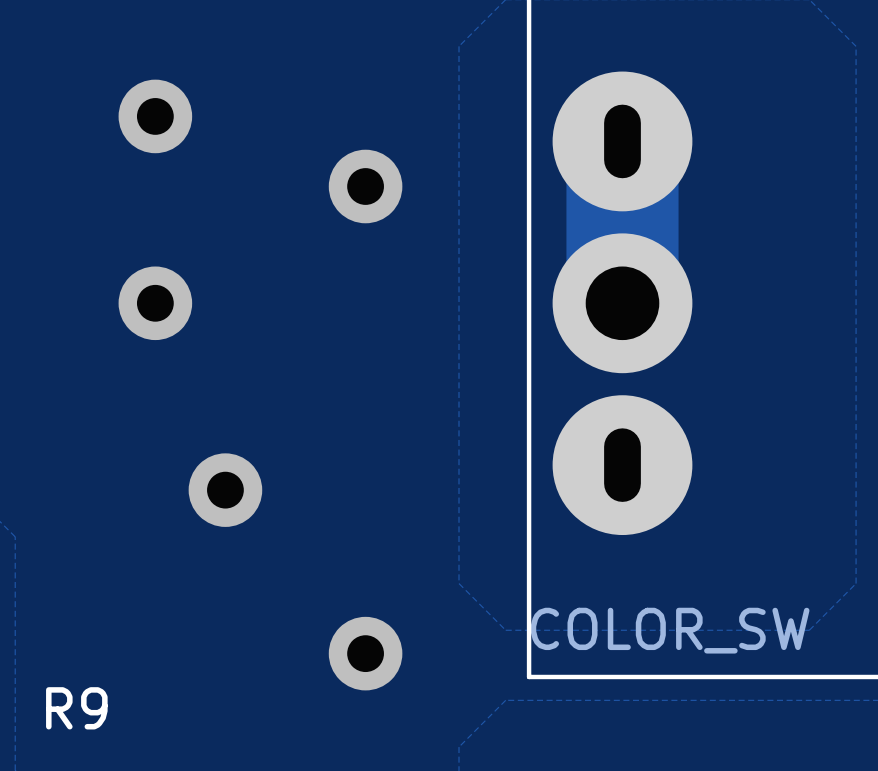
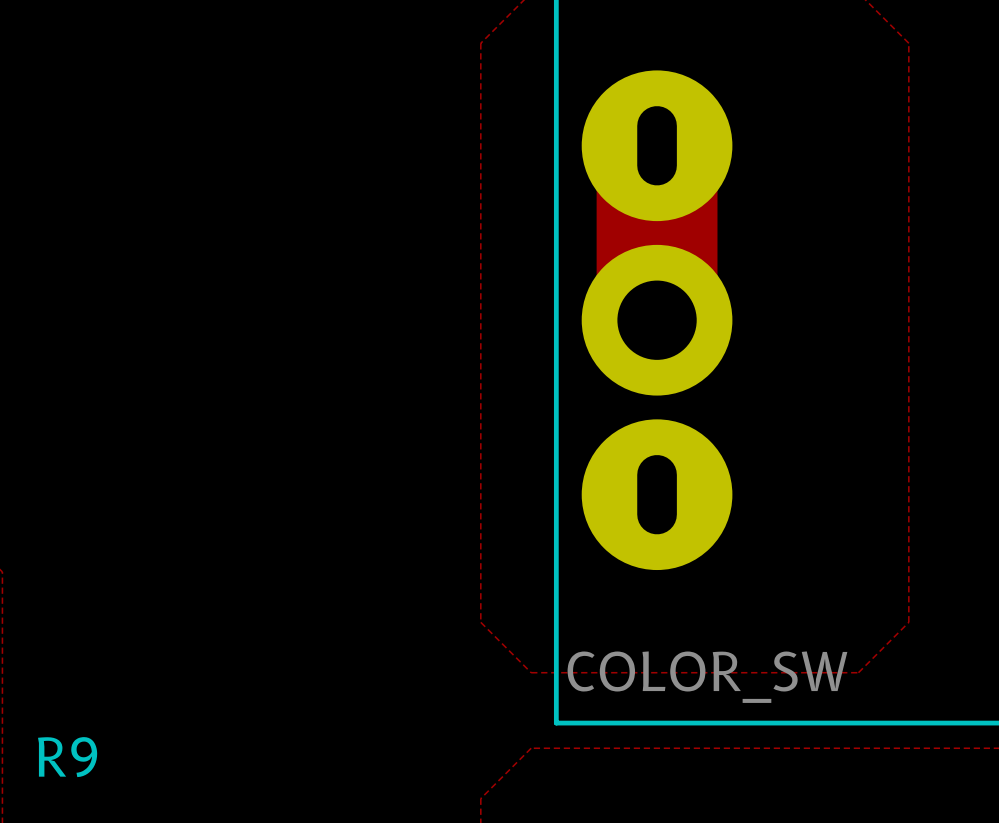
via: (155, 116) -> none
via: (365, 186) -> none
via: (155, 303) -> none
via: (225, 490) -> none
via: (365, 653) -> none

